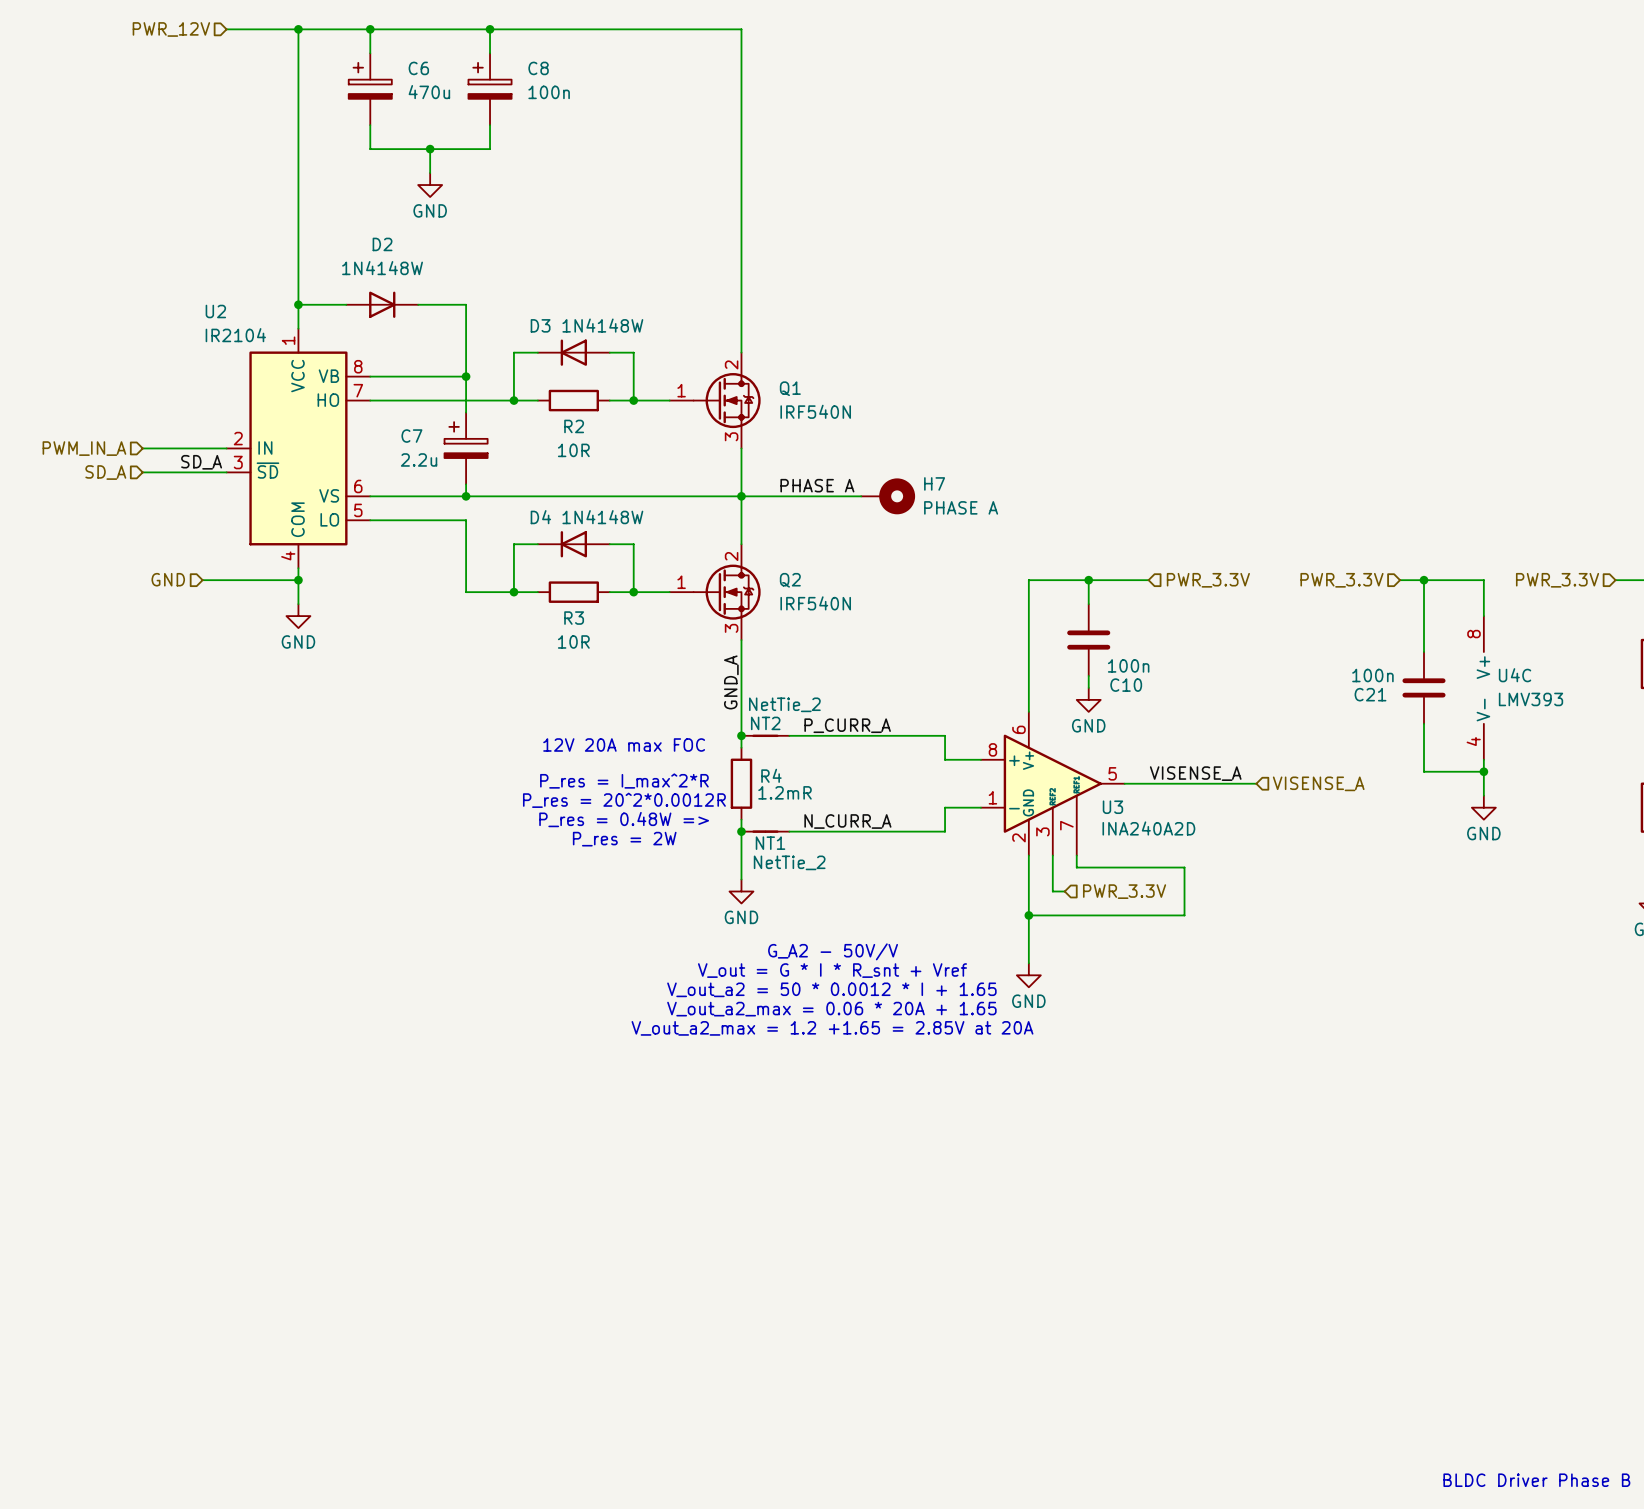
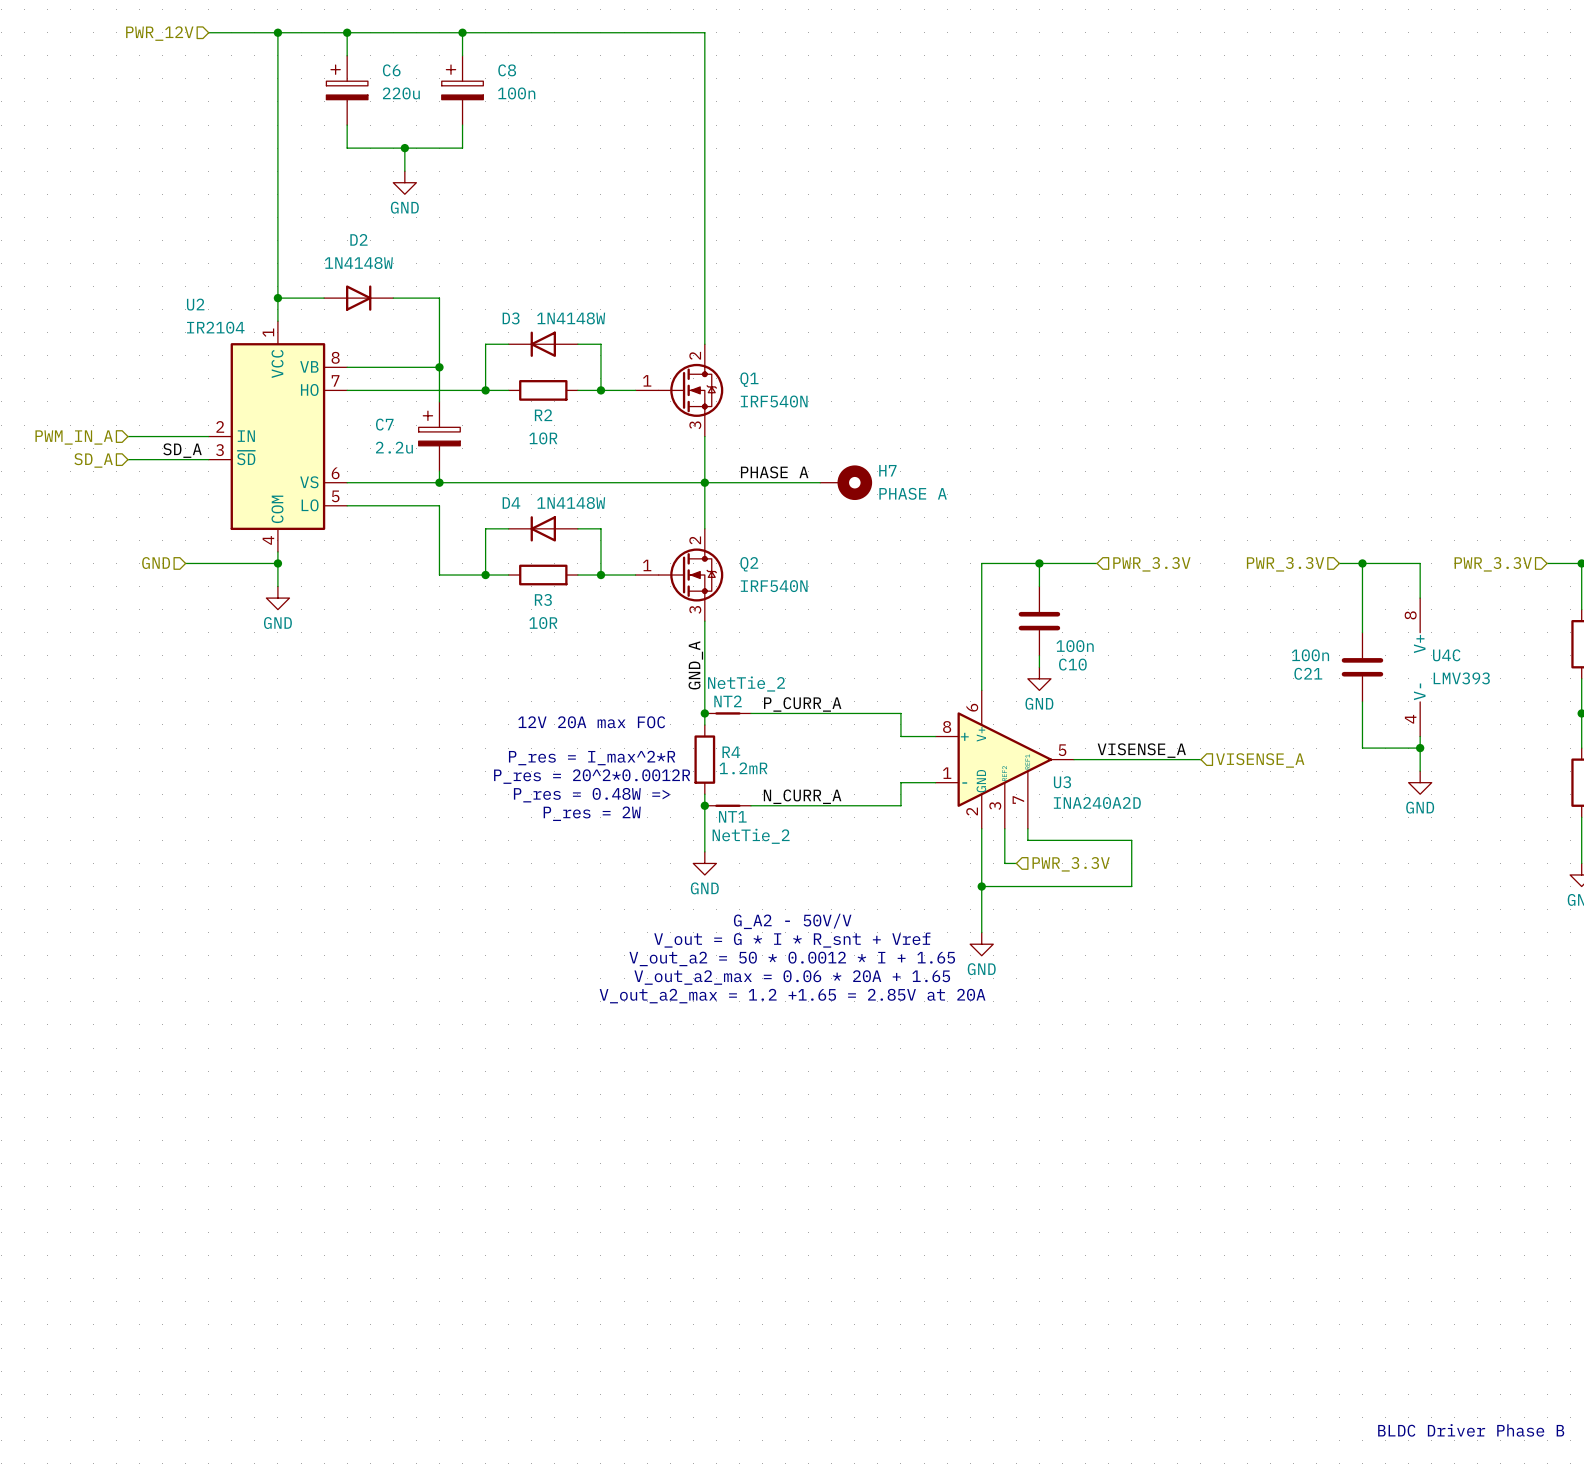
C6 value: 470u (429, 92) -> 220u (401, 93)

